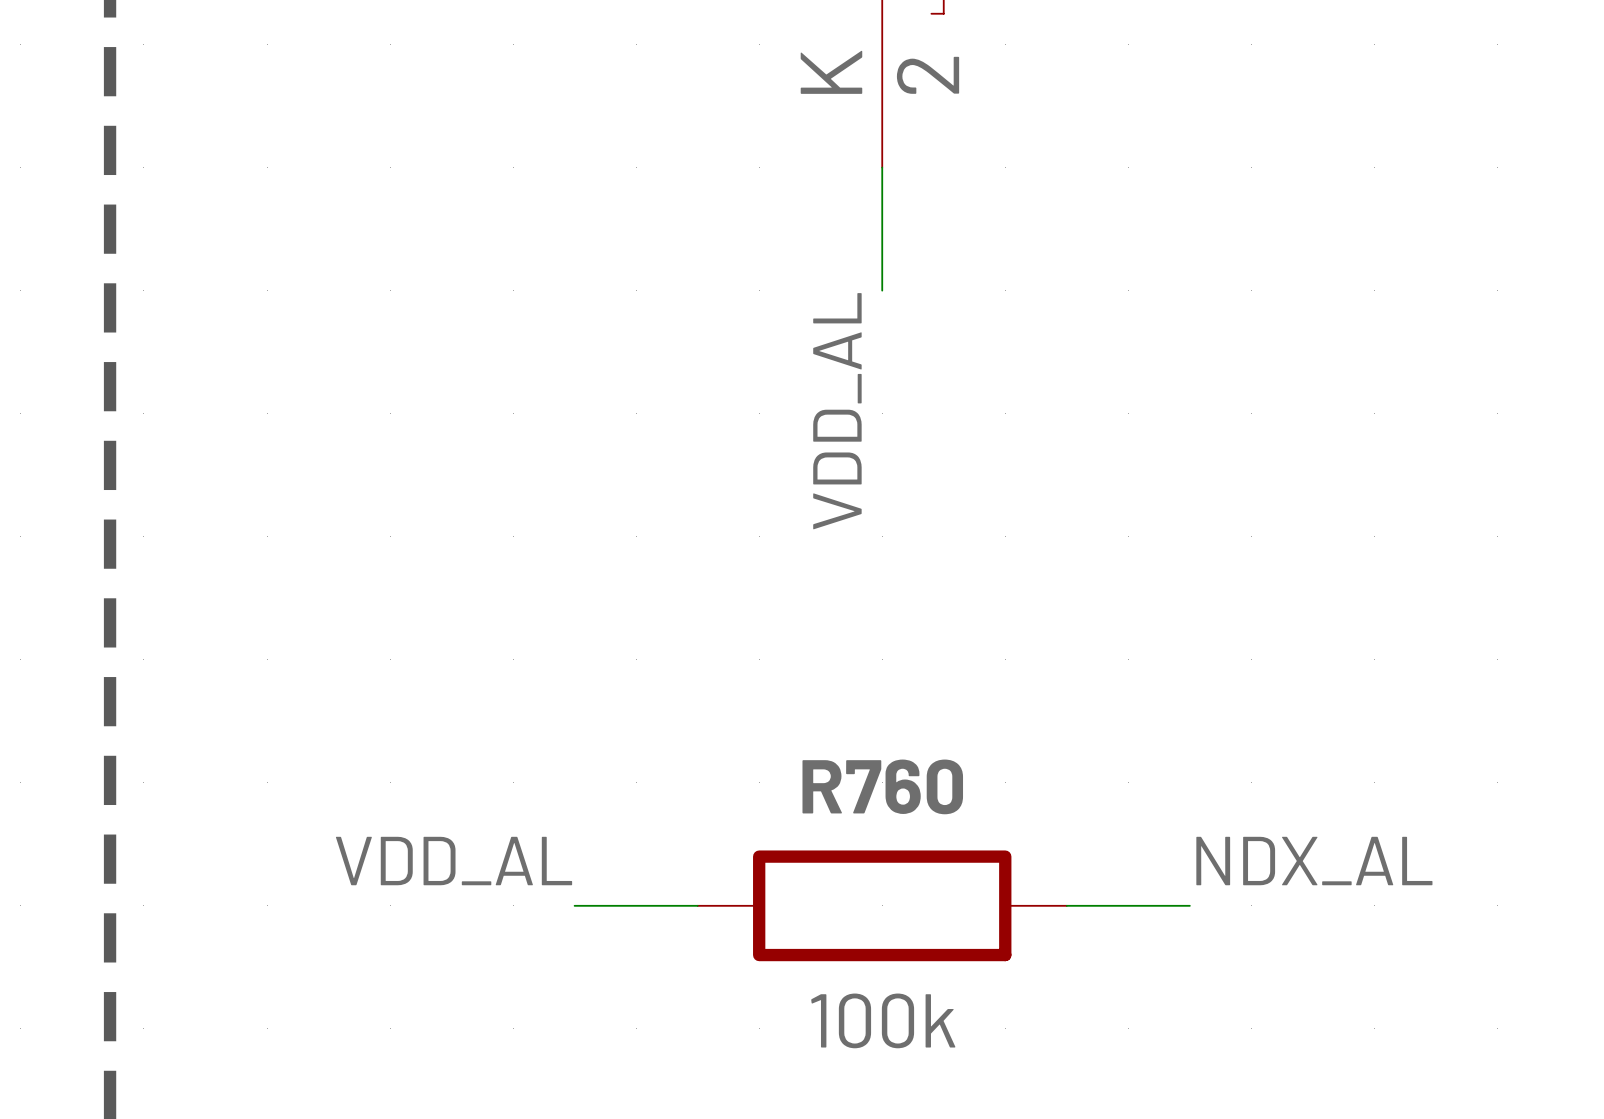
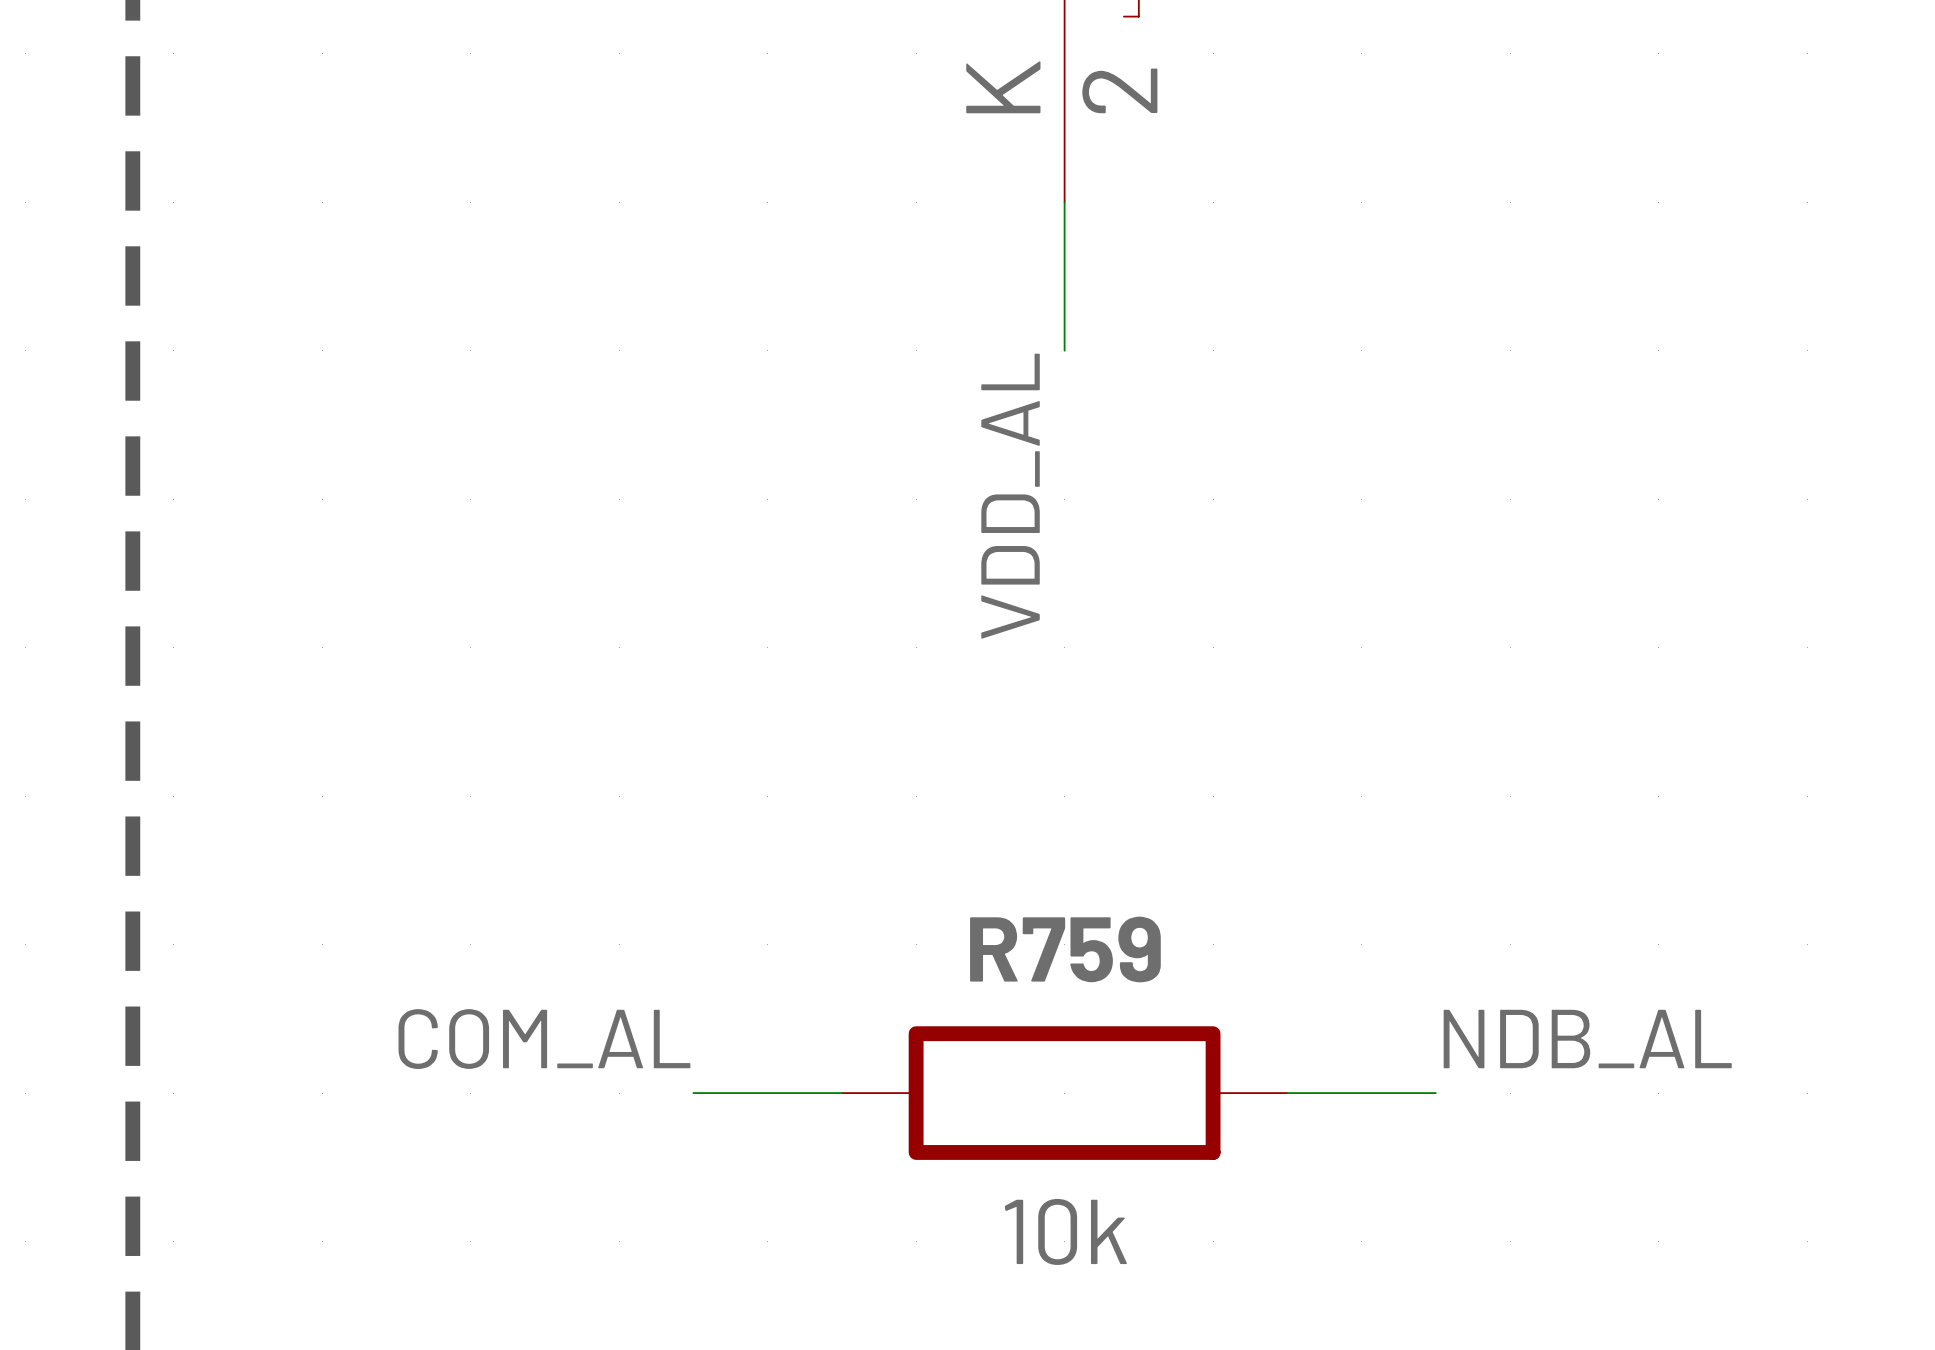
R760 name: R760 (882, 786) -> R759 (1065, 949)
label: VDD_AL (454, 861) -> COM_AL (544, 1039)
label: NDX_AL (1314, 861) -> NDB_AL (1587, 1039)
R760 value: 100k (883, 1020) -> 10k (1065, 1231)

